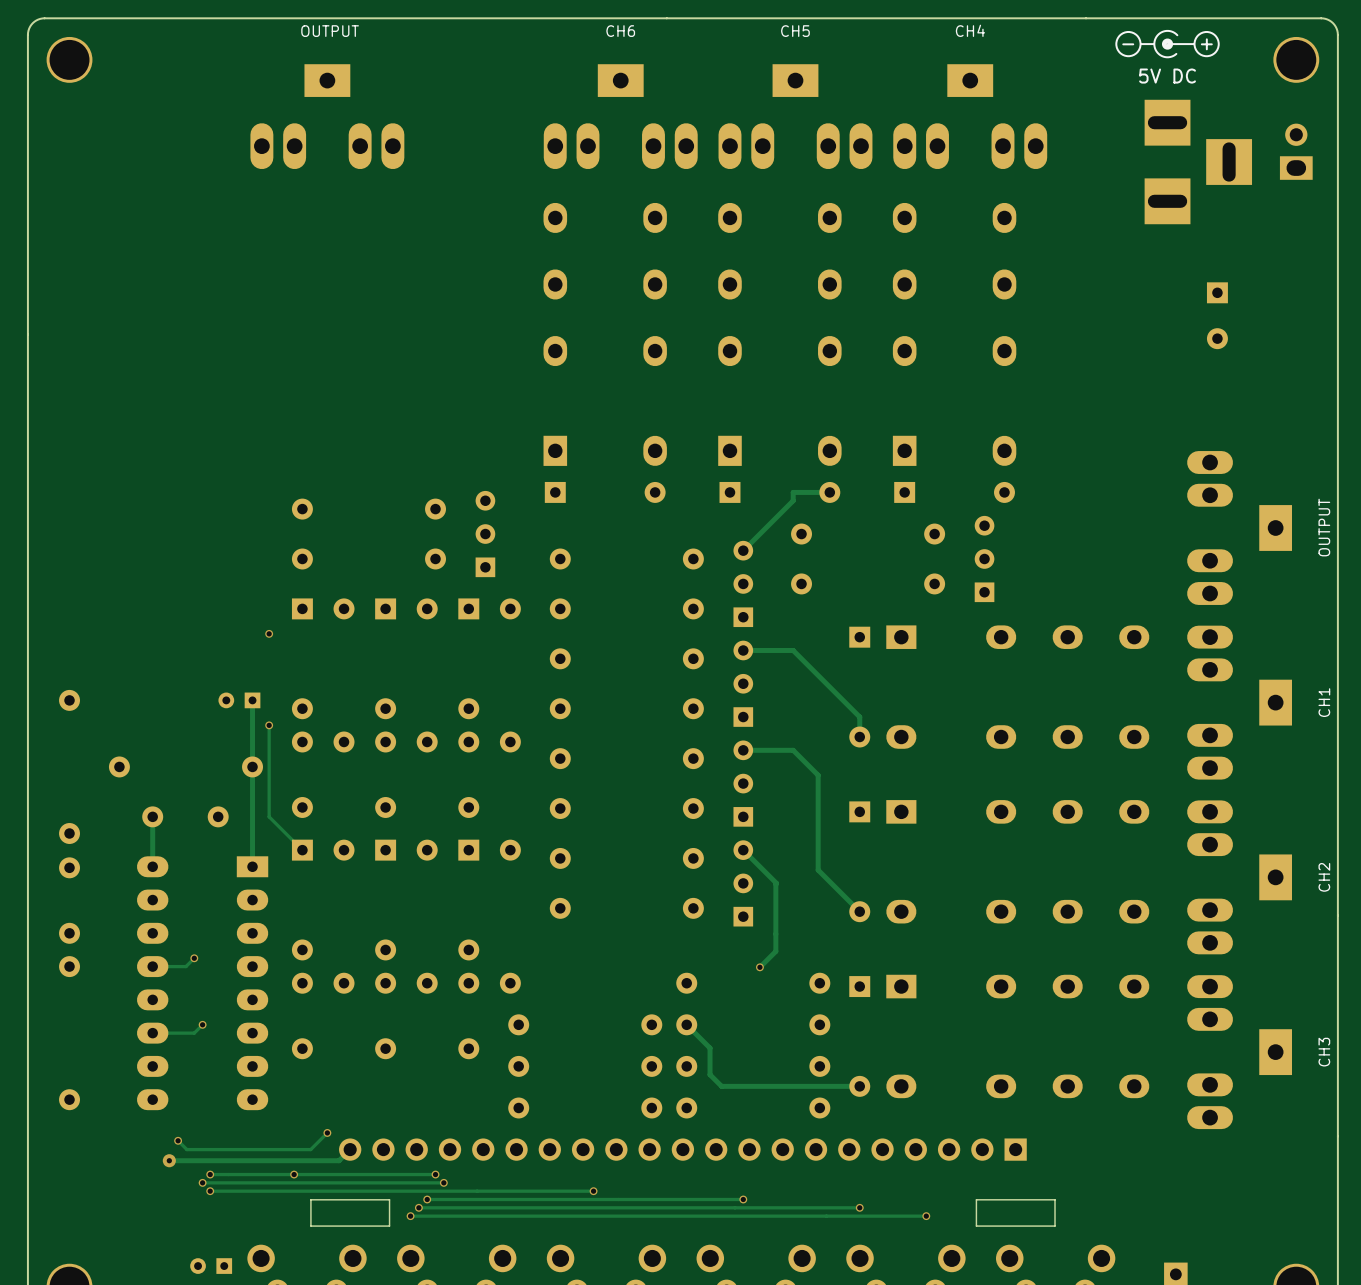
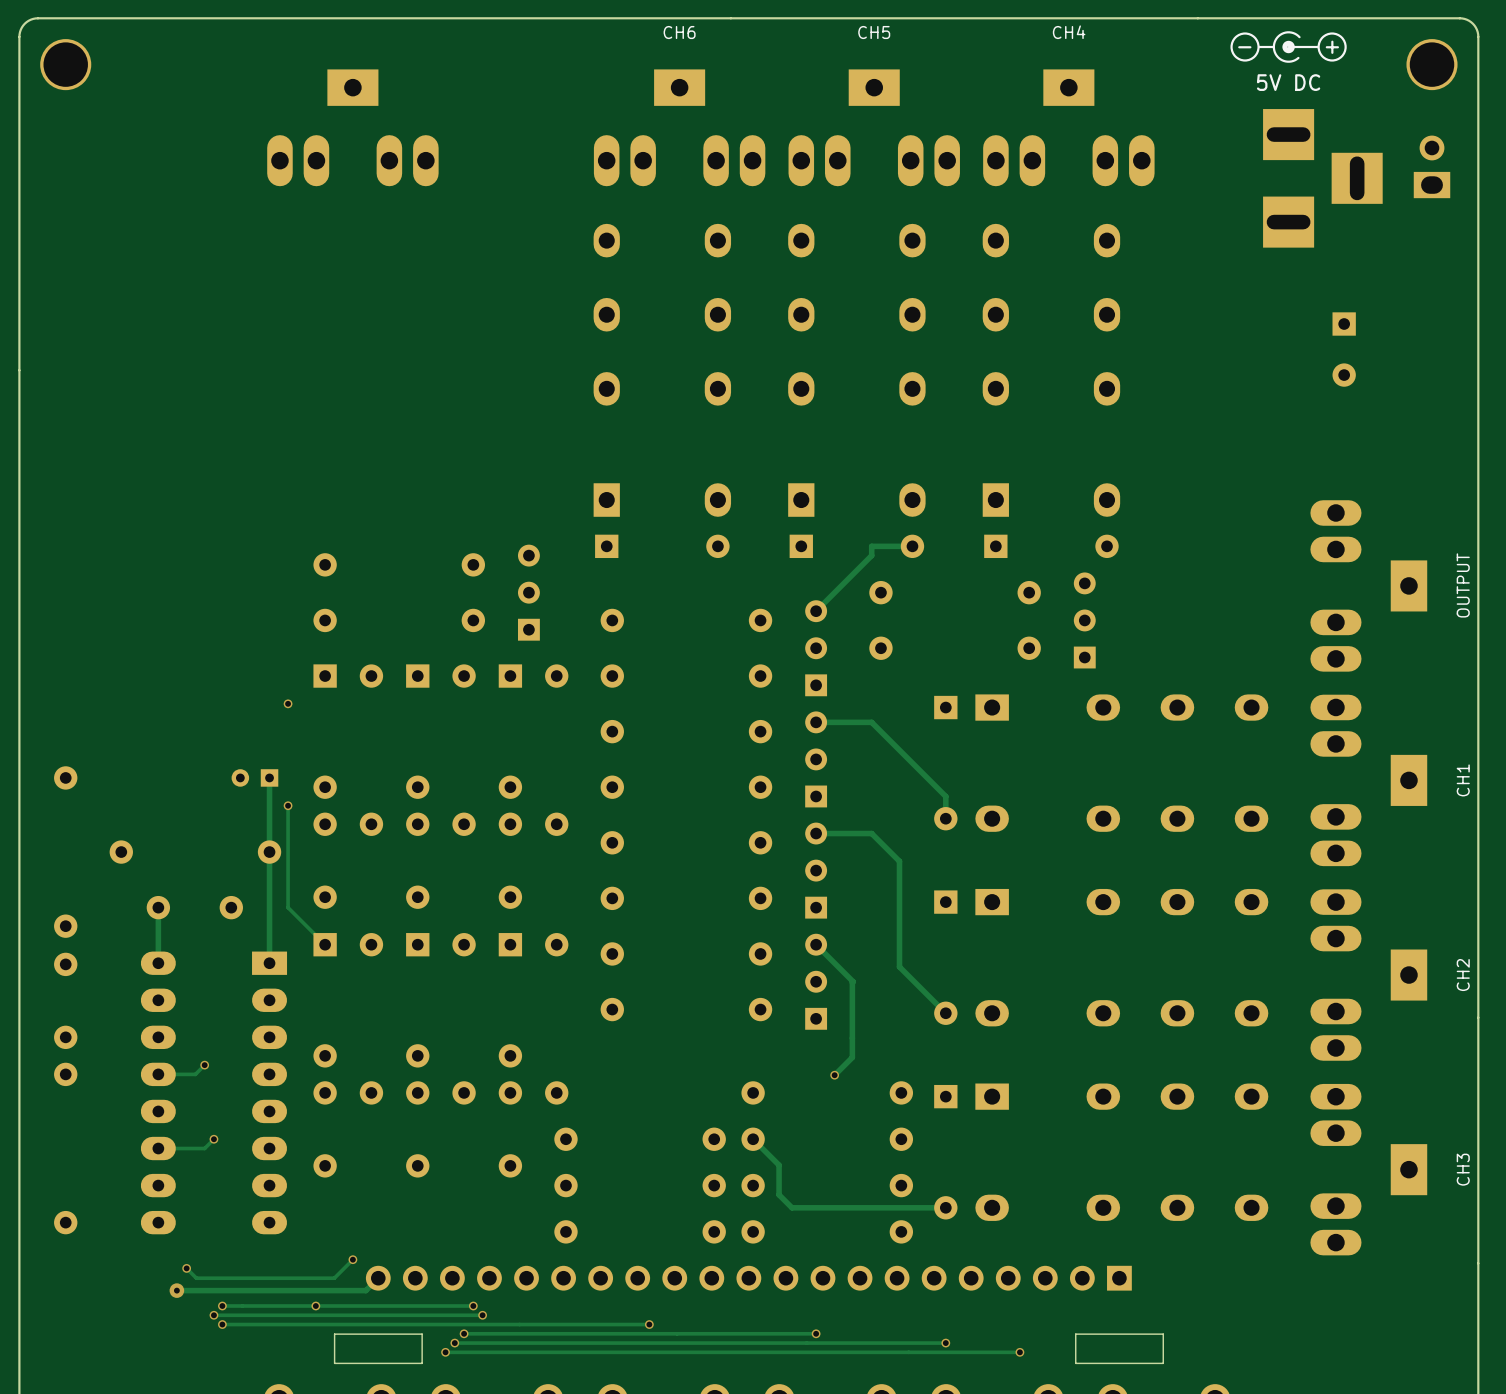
text: OUTPUT (330, 31) -> none

